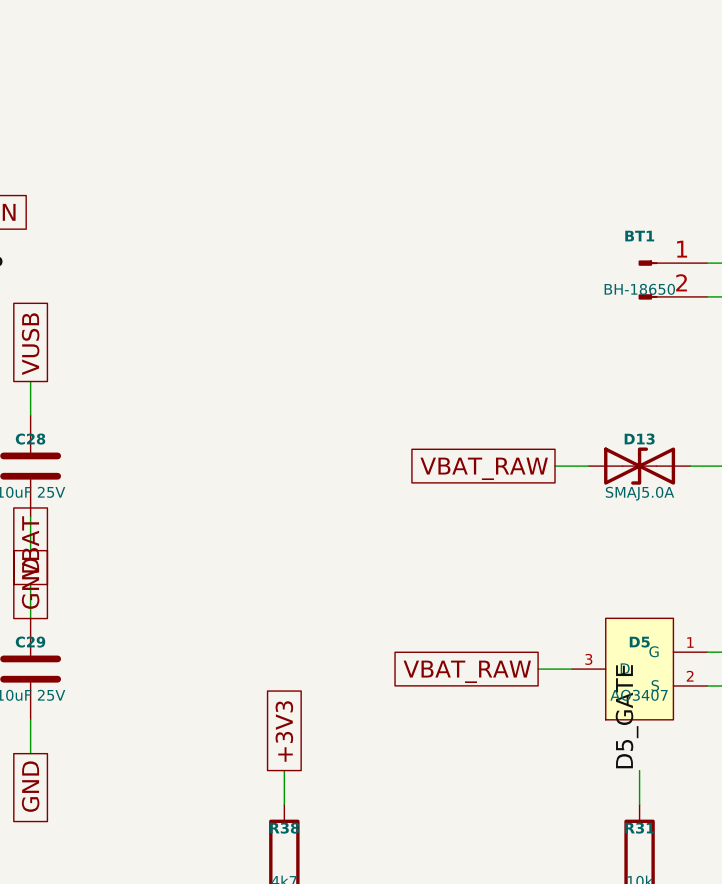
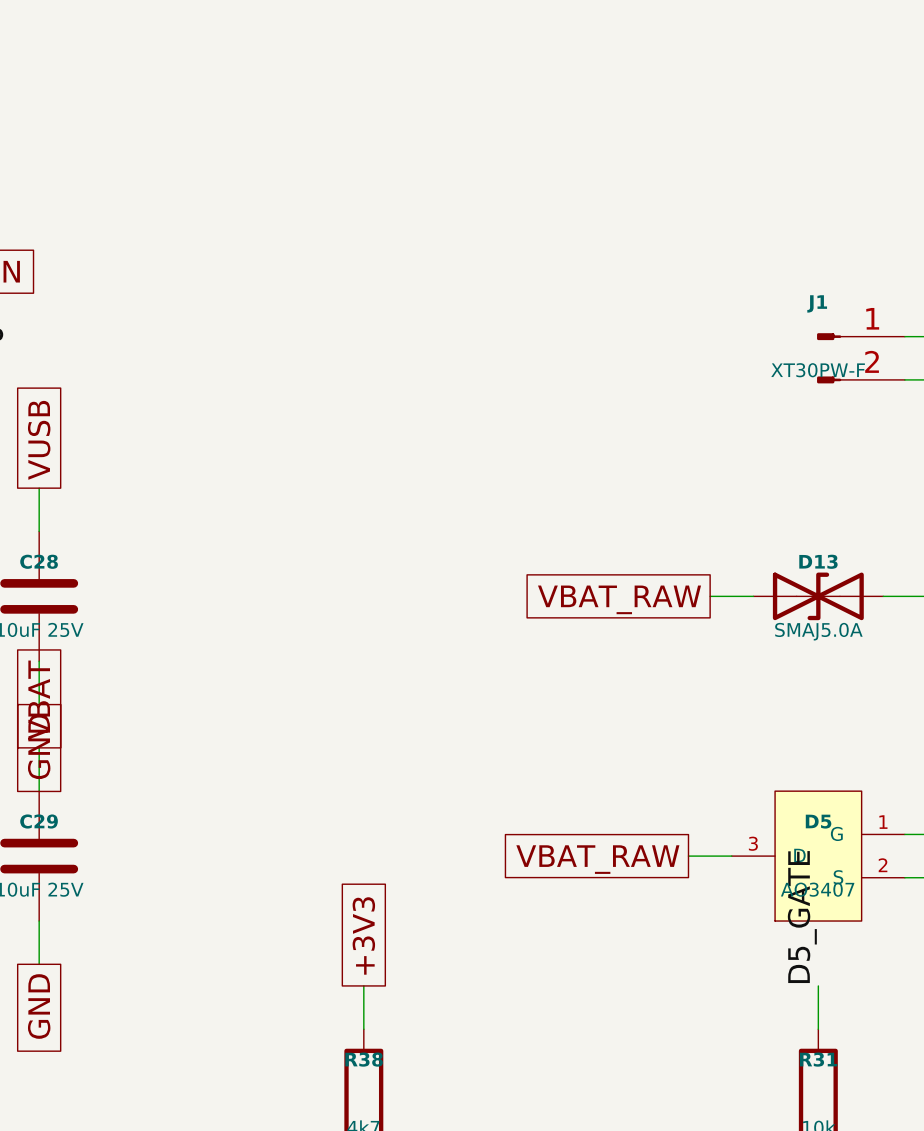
BT1 name: BT1 (639, 236) -> J1 (817, 303)
BT1 value: BH-18650 (639, 289) -> XT30PW-F (818, 370)

